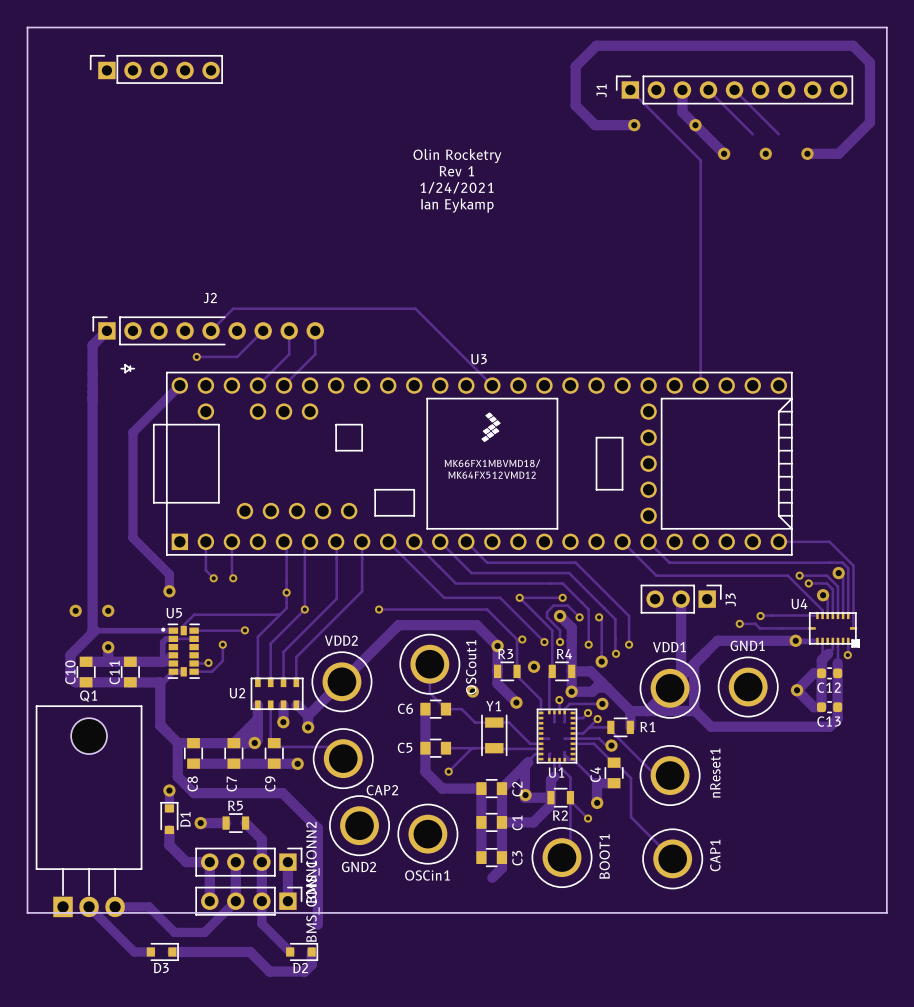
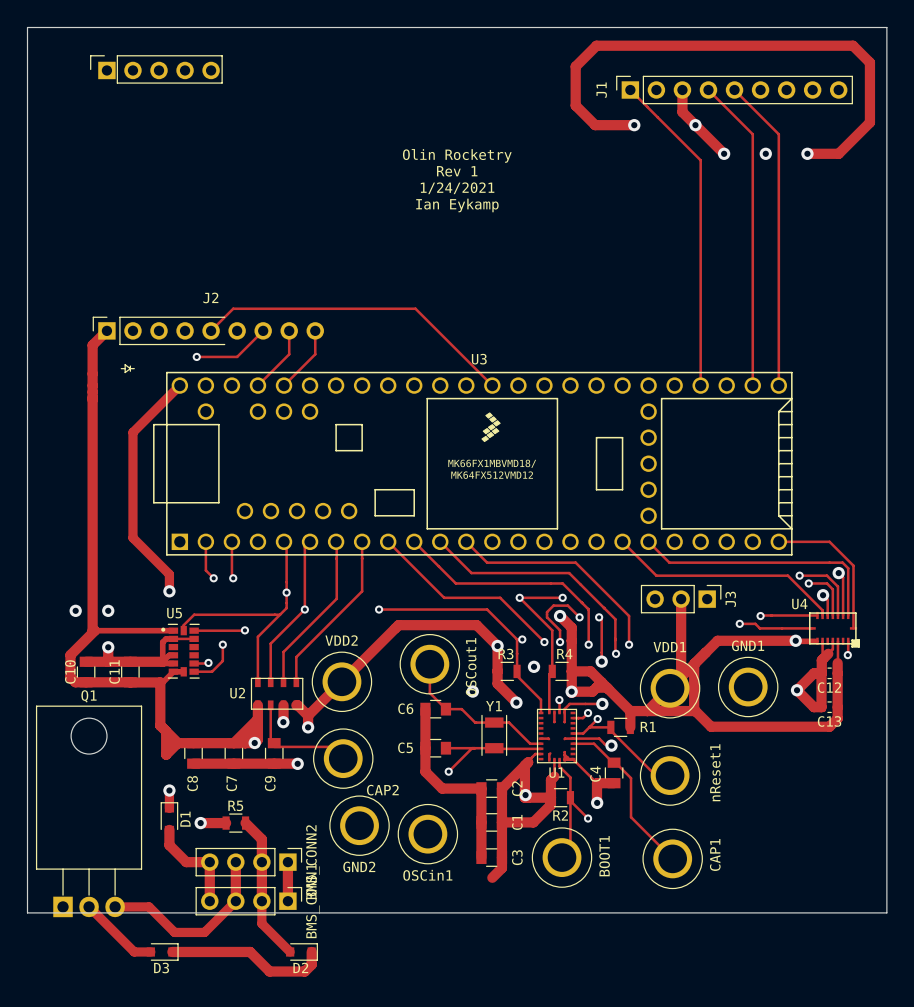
track: none -> (752, 134) (752, 385)
track: none -> (778, 134) (778, 385)
track: (177, 743) (177, 776) (194, 793) (282, 793) (317, 828) (317, 924) -> (177, 743) (166, 754) (166, 731)

